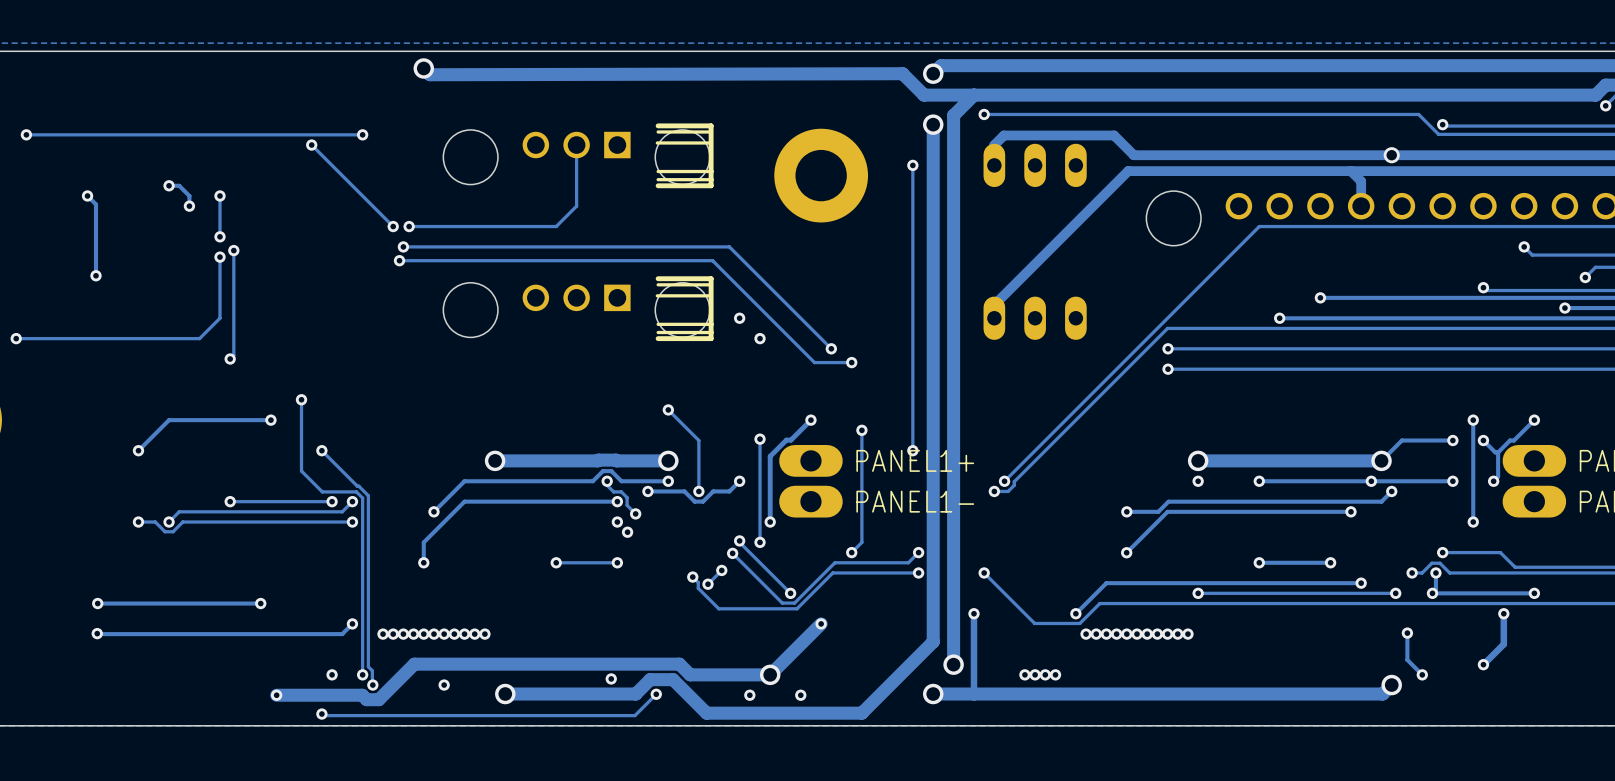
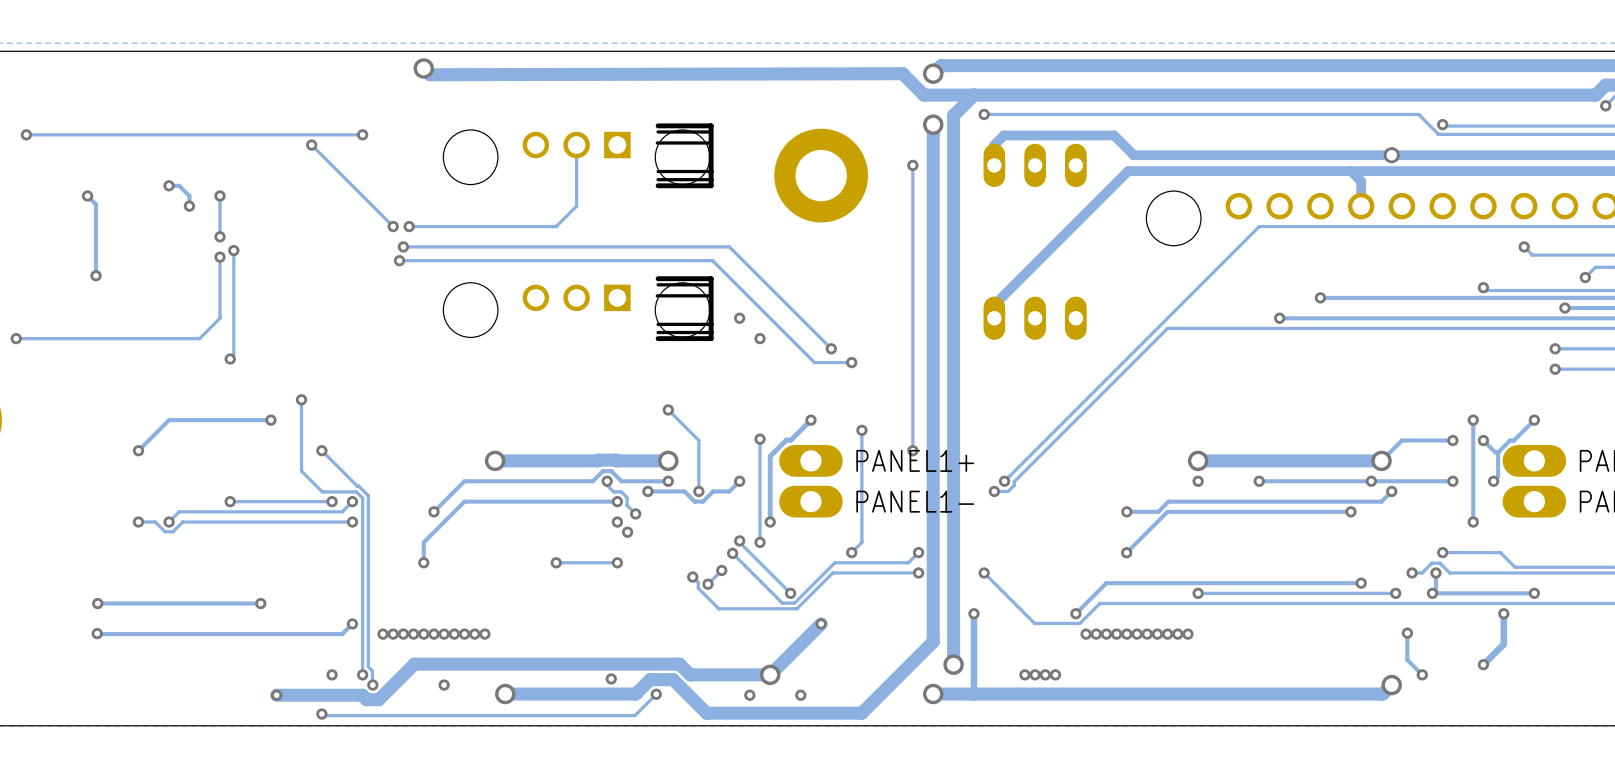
via: (1168, 348) -> none
track: (1555, 348) (1168, 348) -> none
via: none -> (1555, 348)
via: (1168, 369) -> none
track: (1555, 369) (1168, 369) -> none
via: none -> (1555, 369)
via: (1259, 562) -> none
track: (1330, 562) (1259, 562) -> none
via: (1330, 562) -> none

